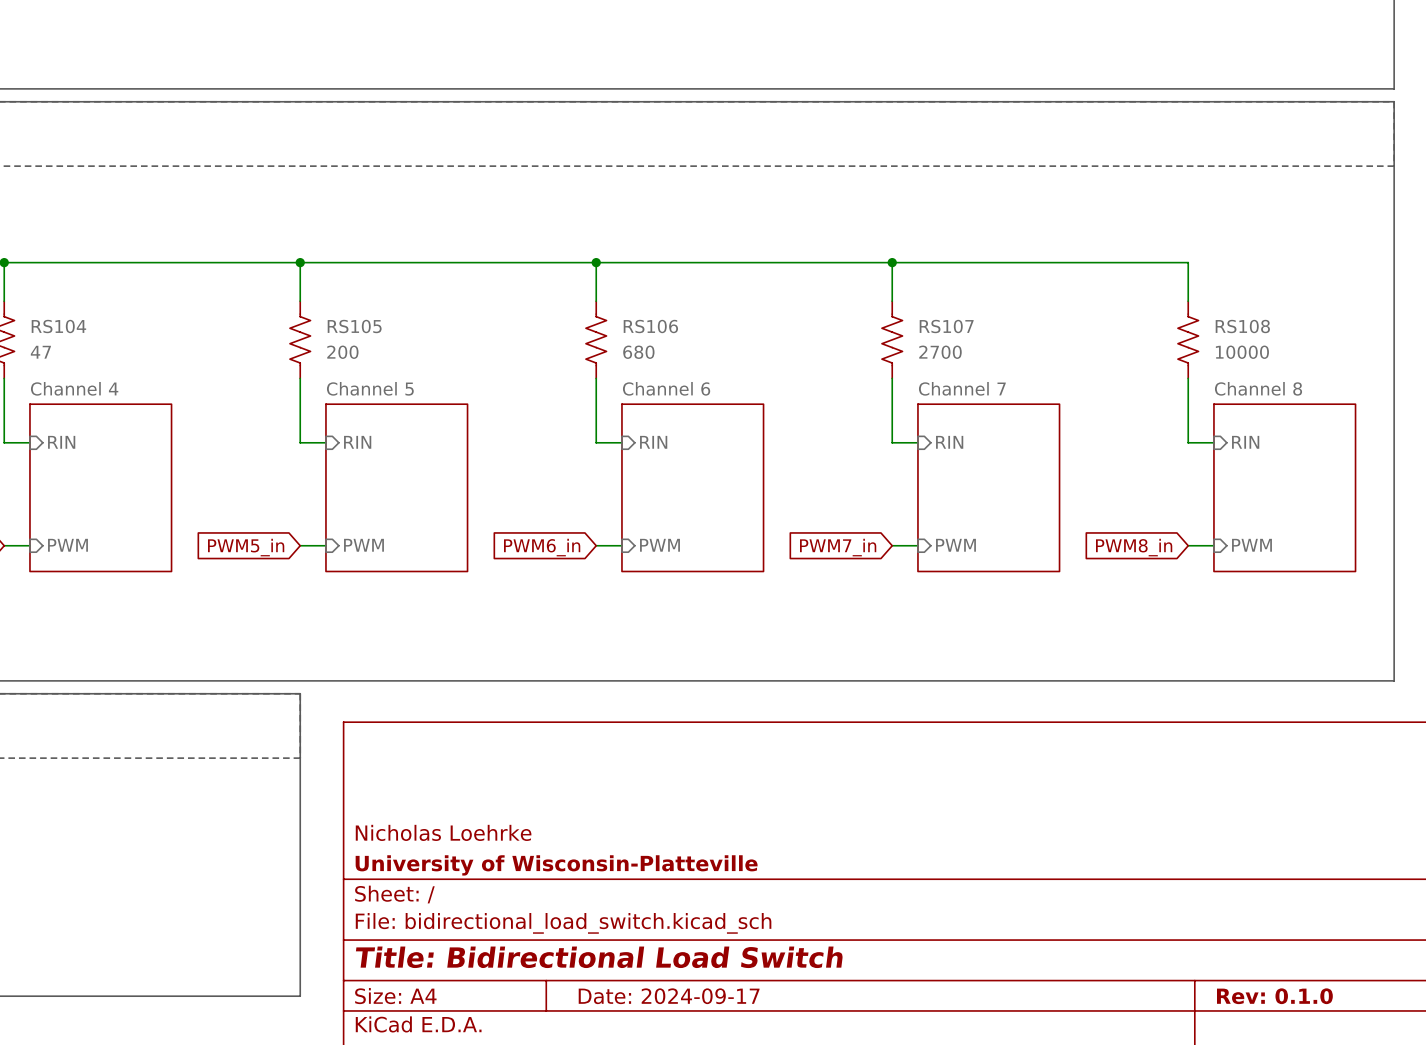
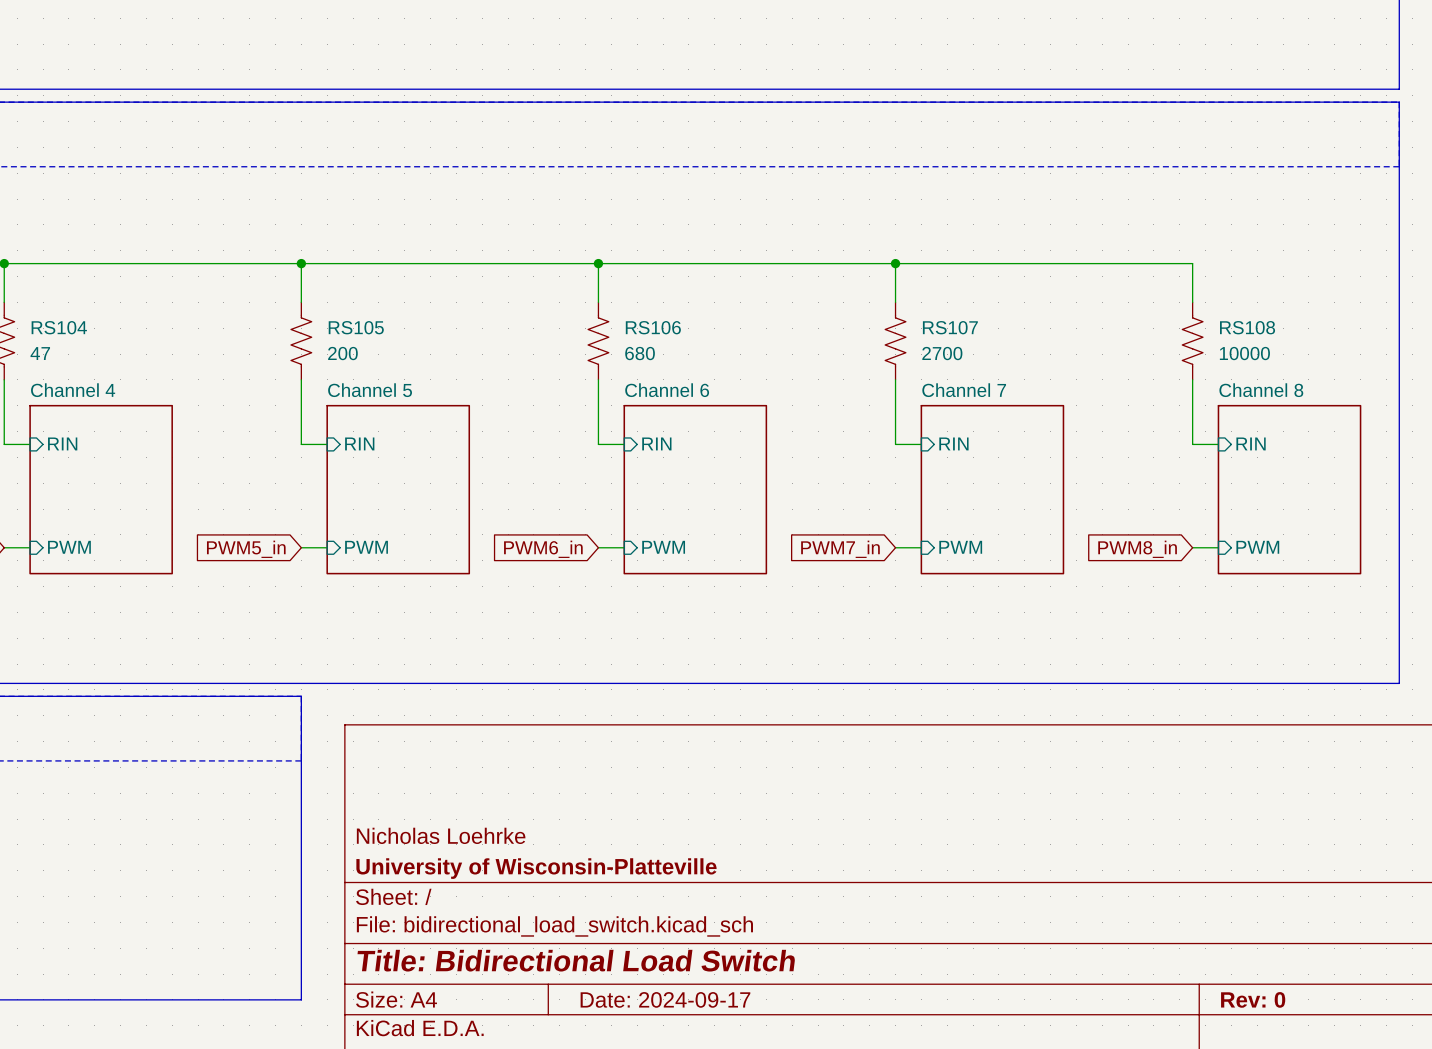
title block: Rev: 0.1.0 (1274, 996) -> Rev: 0 (1253, 999)

